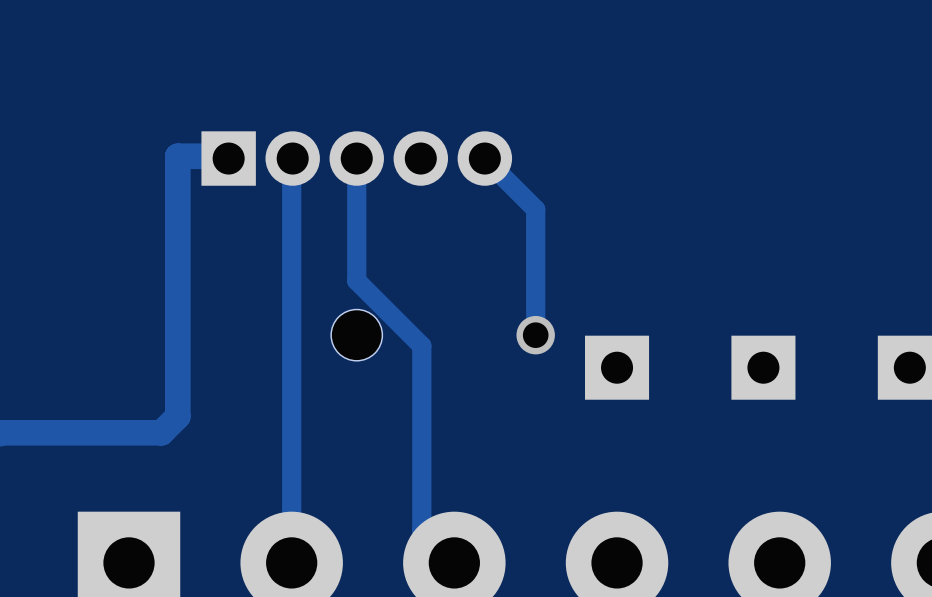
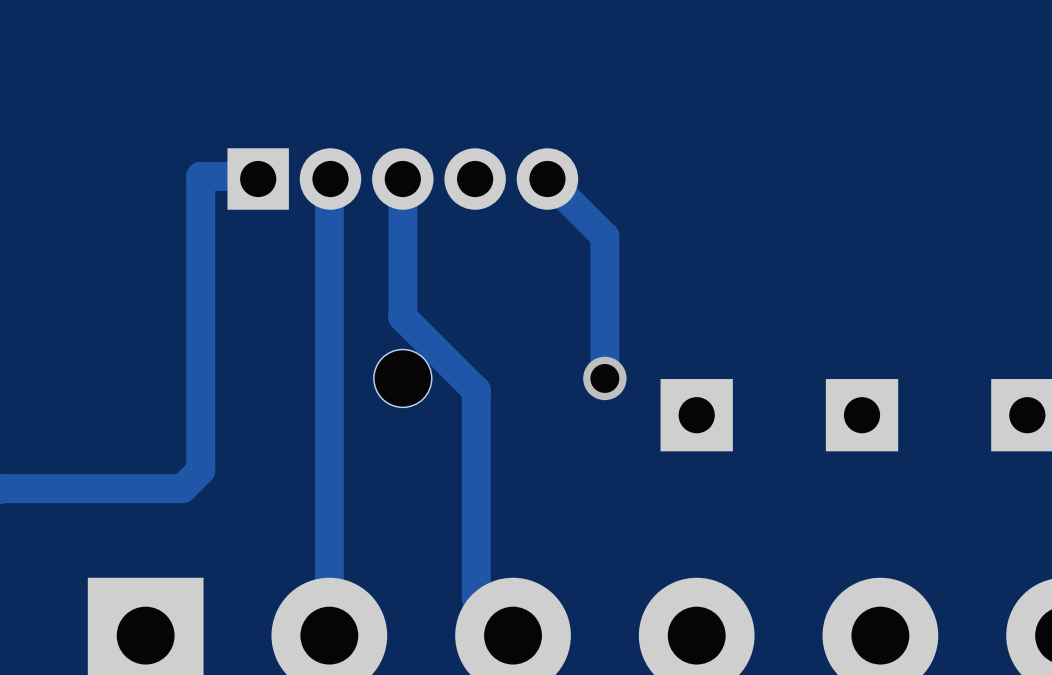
track width: thin (356, 158) (356, 280) (421, 345) (421, 530) -> thick (402, 179) (402, 317) (476, 390) (476, 598)
track width: thin (484, 158) (535, 209) (535, 335) -> thick (547, 179) (604, 236) (604, 378)
track width: thin (291, 159) (291, 562) -> thick (329, 180) (329, 635)

